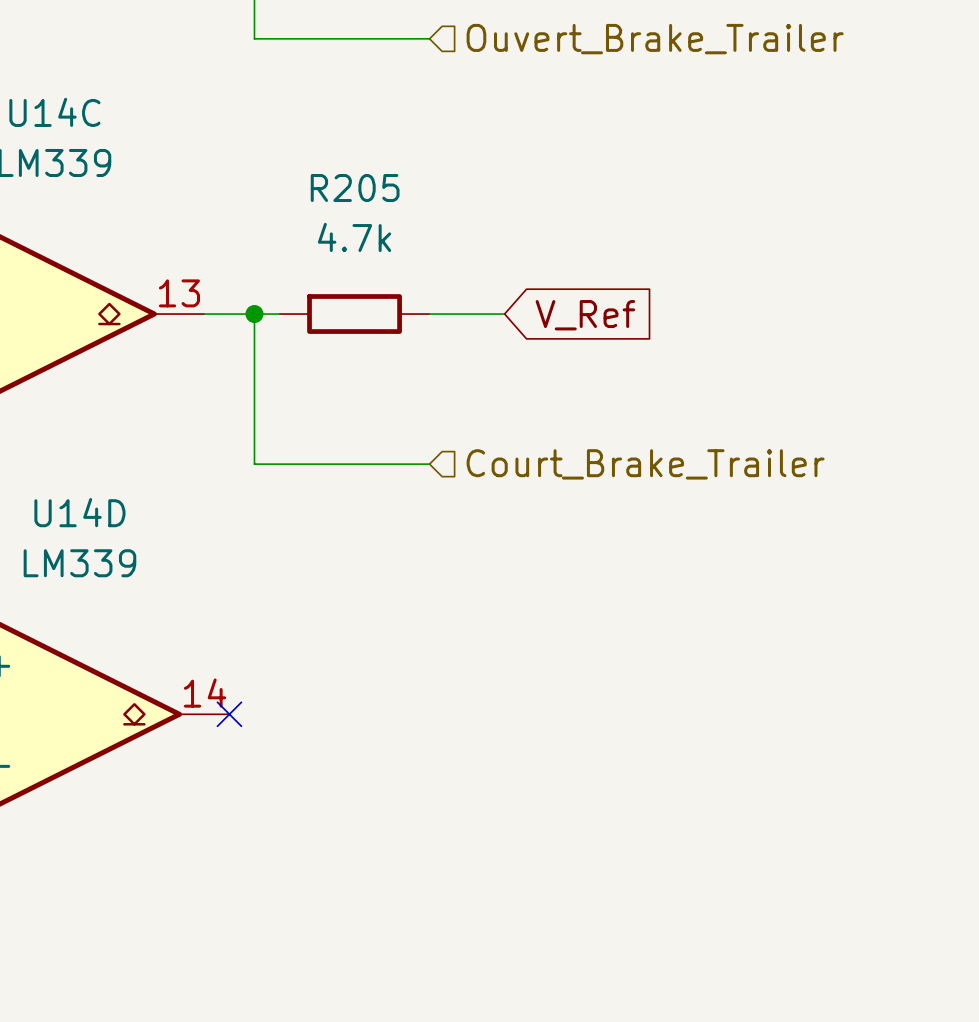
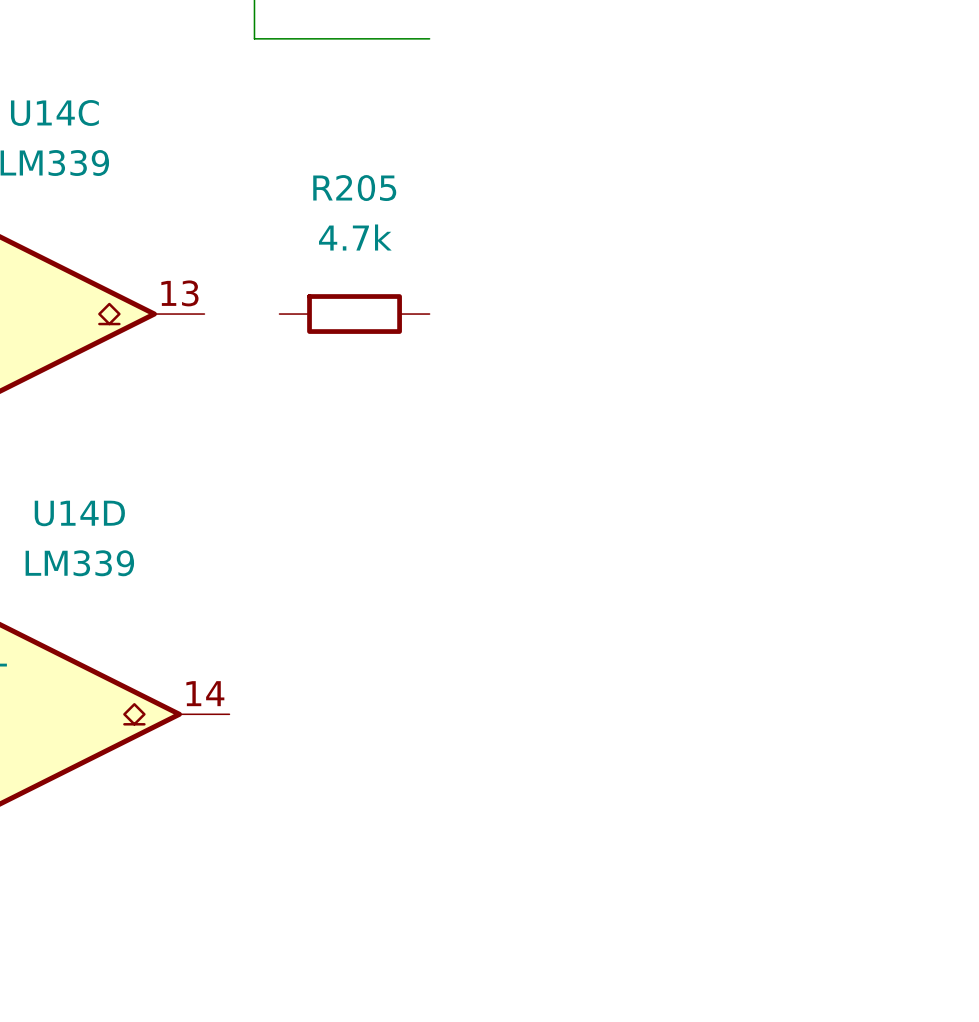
hierarchical label: Ouvert_Brake_Trailer (655, 39) -> none
wire: (204, 314) (279, 314) -> none
wire: (254, 314) (254, 464) (429, 464) -> none
junction: (254, 314) -> none
wire: (429, 314) (504, 314) -> none
global label: V_Ref (585, 315) -> none
hierarchical label: Court_Brake_Trailer (645, 464) -> none
no-connect mark: (229, 714) -> none

